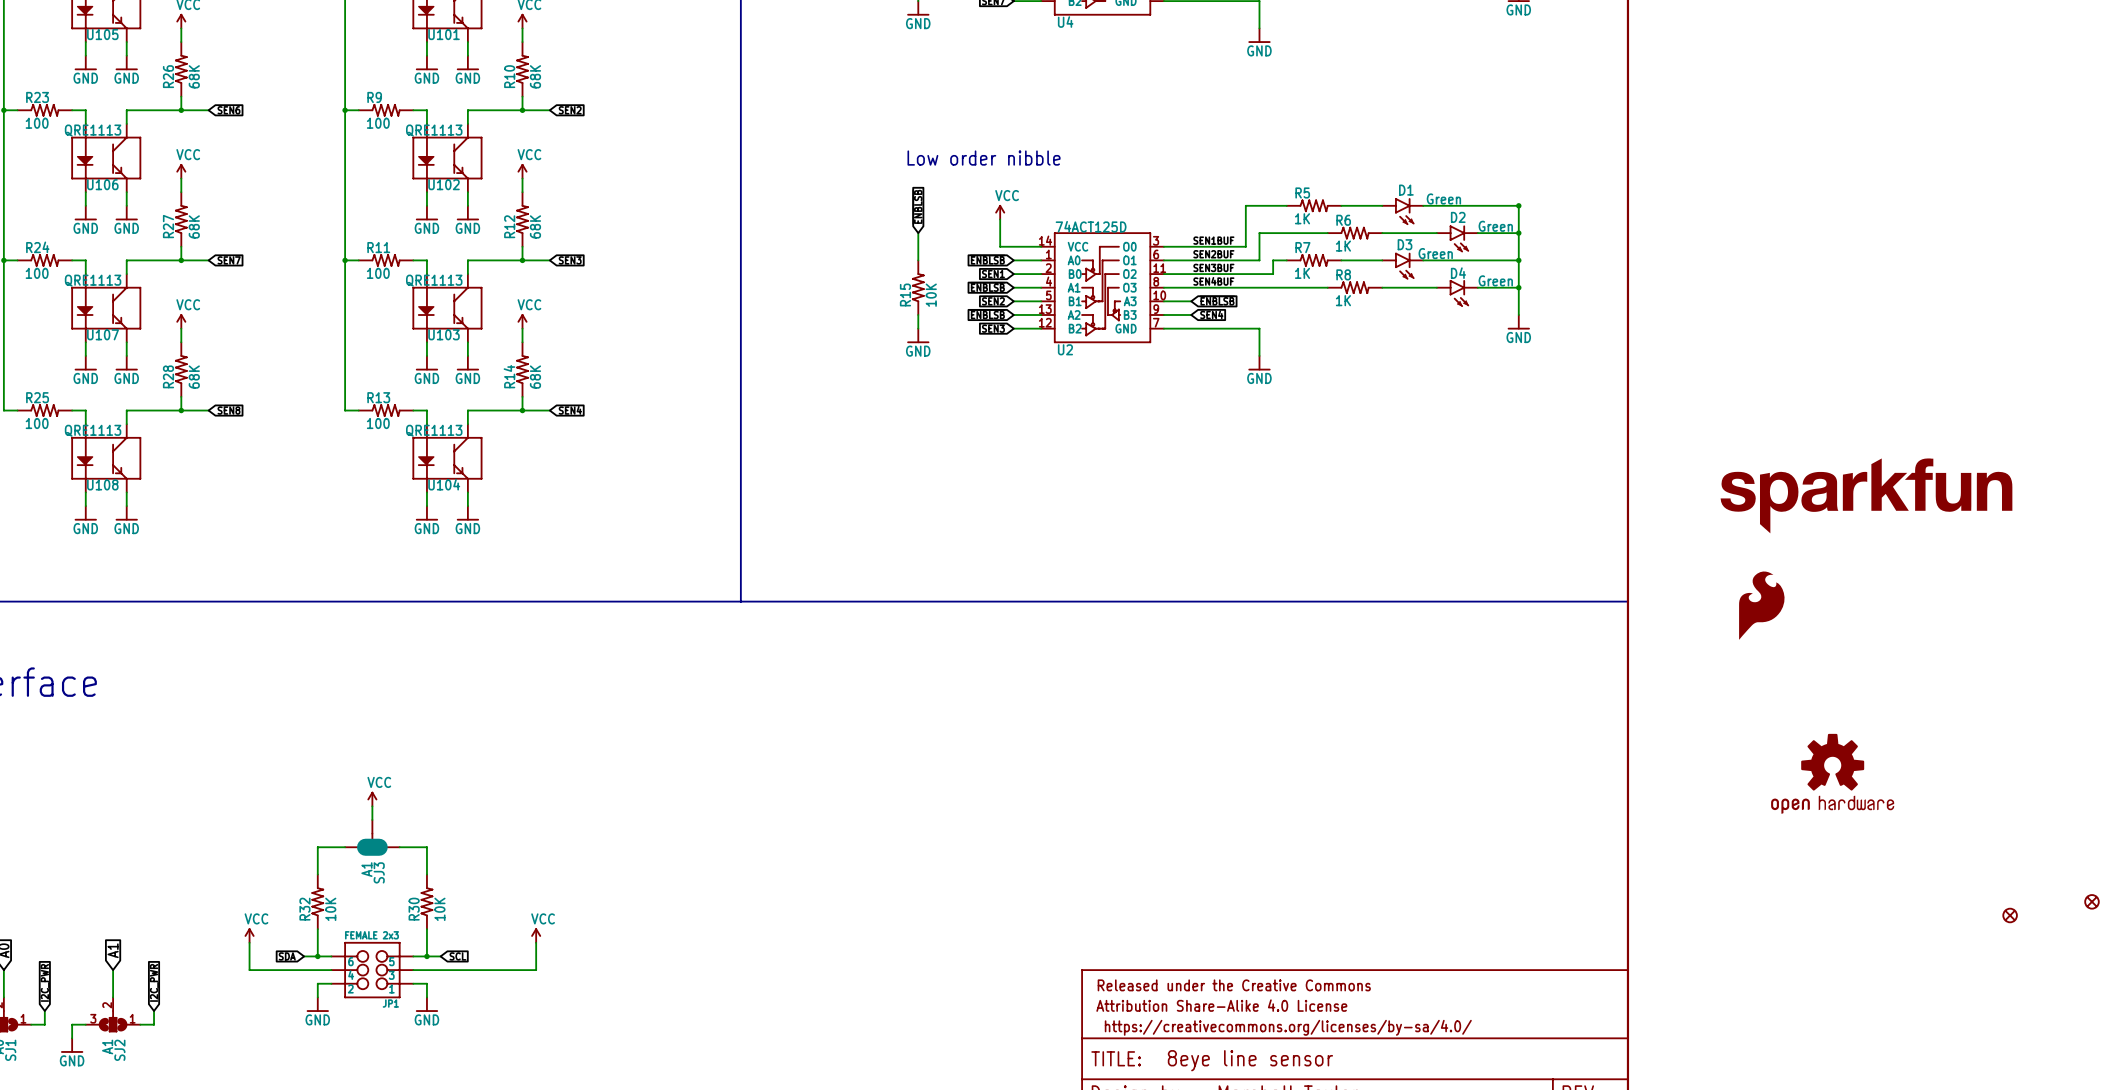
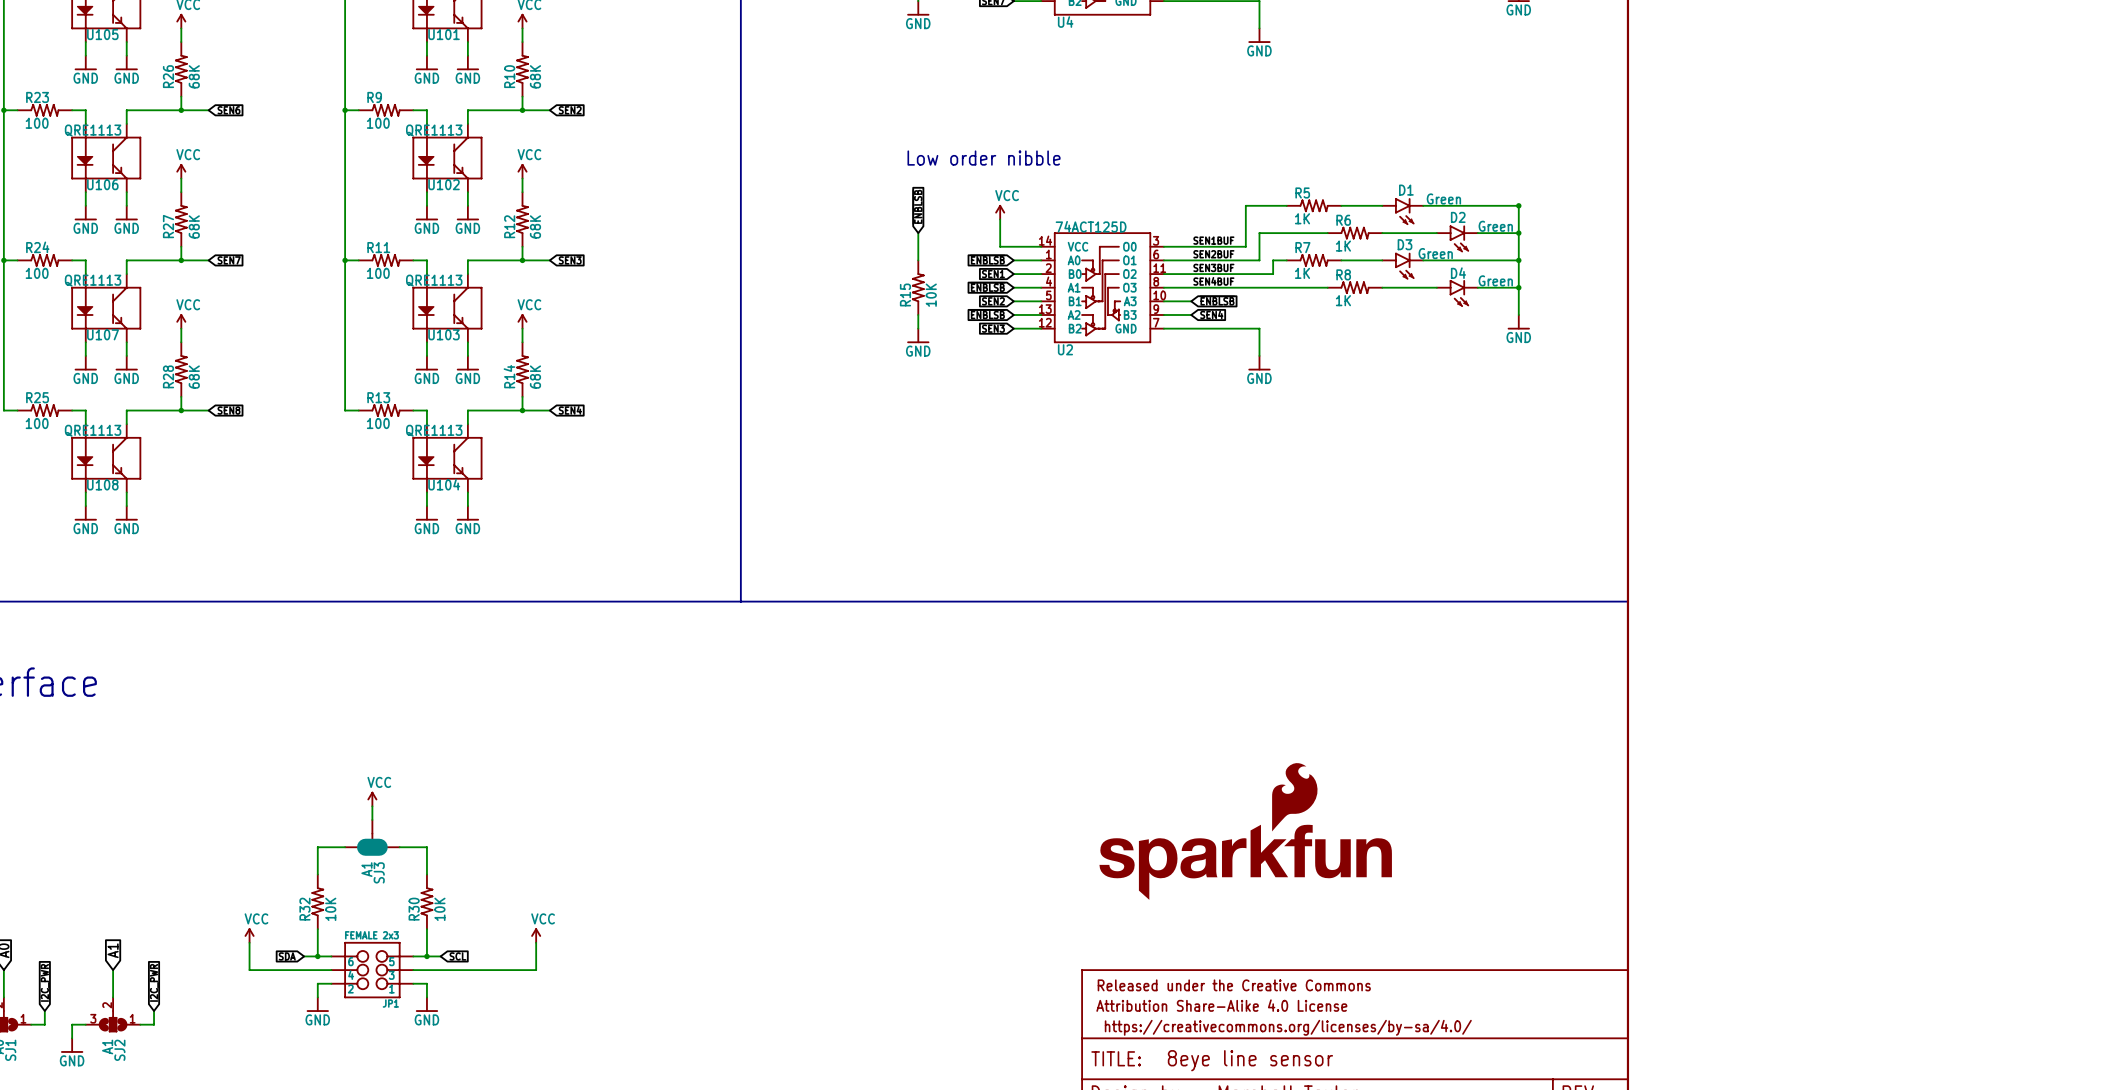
part: (1866, 495) -> none
part: (1761, 605) -> none
part: (1832, 773) -> none
part: none -> (1245, 831)
part: (2091, 901) -> none
part: (2010, 915) -> none

